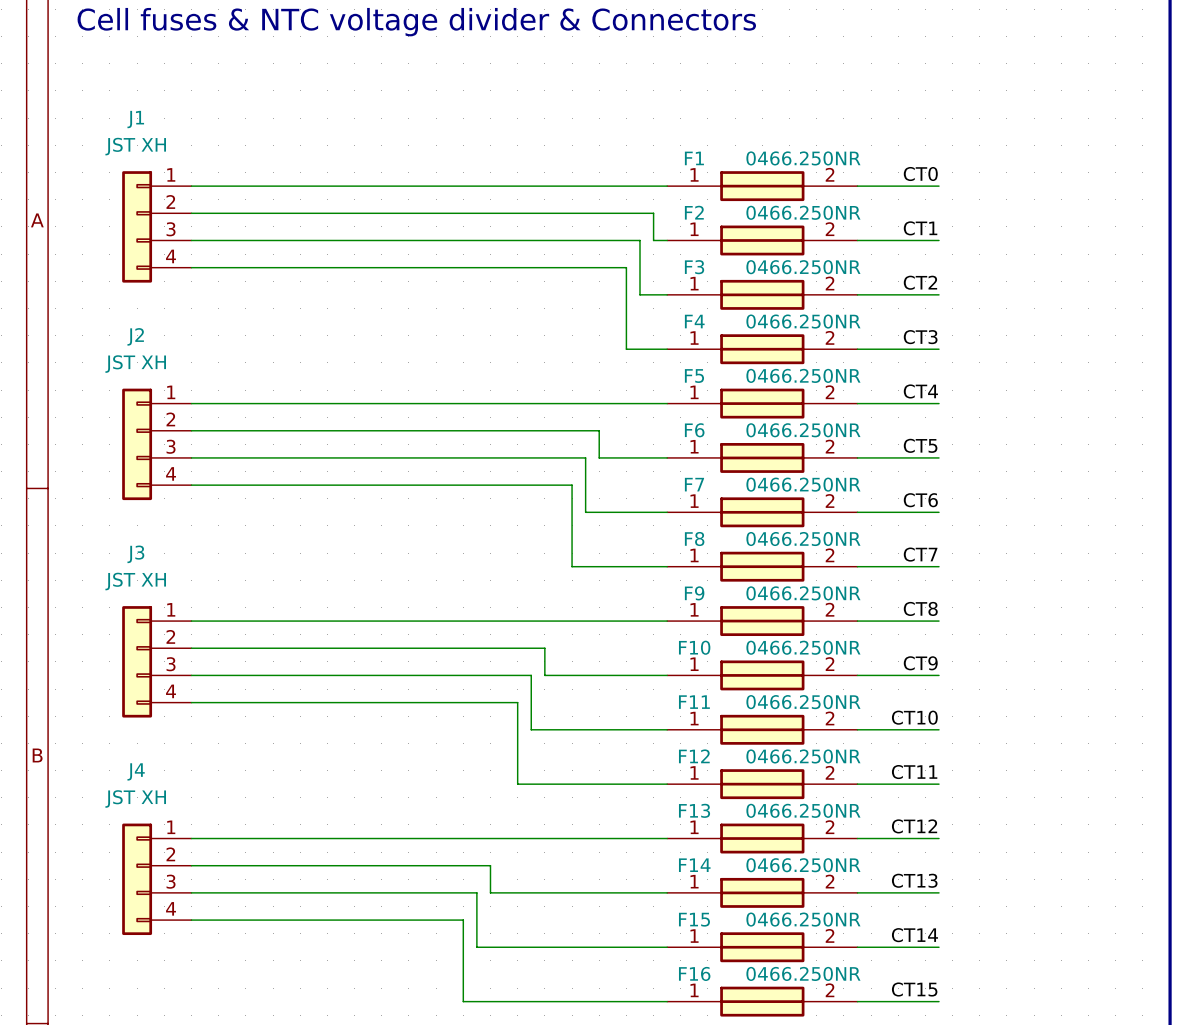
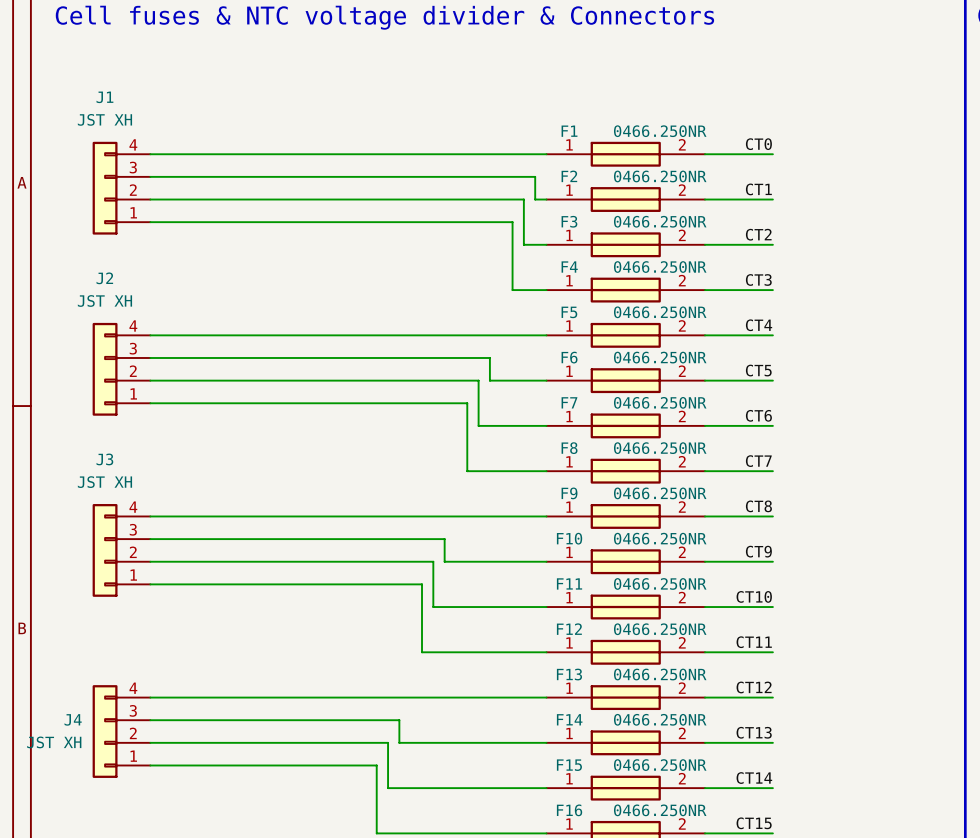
J1 flip: as is (137, 226) -> up-down (105, 188)
J2 flip: as is (137, 444) -> up-down (105, 369)
J3 flip: as is (137, 661) -> up-down (105, 550)
J4 name position: J4 (136, 771) -> J4 (73, 719)
J4 value position: JST XH (135, 798) -> JST XH (54, 742)
J4 flip: as is (137, 879) -> up-down (105, 731)

